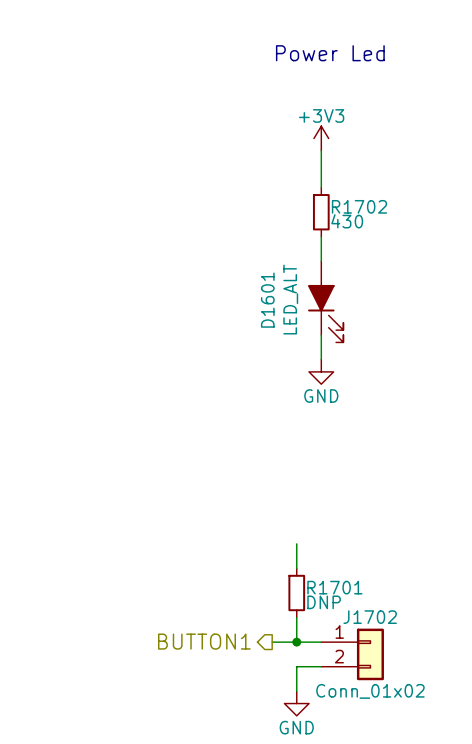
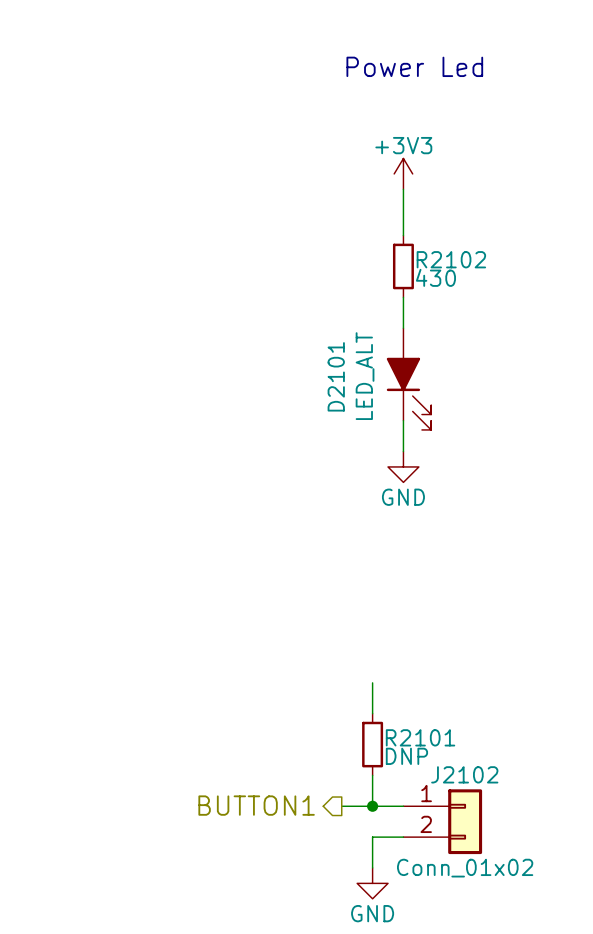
R1702 name: R1702 (359, 206) -> R2102 (451, 259)
D1601 name: D1601 (267, 300) -> D2101 (336, 376)
R1701 name: R1701 (334, 587) -> R2101 (420, 737)
J1702 name: J1702 (370, 617) -> J2102 (464, 774)

